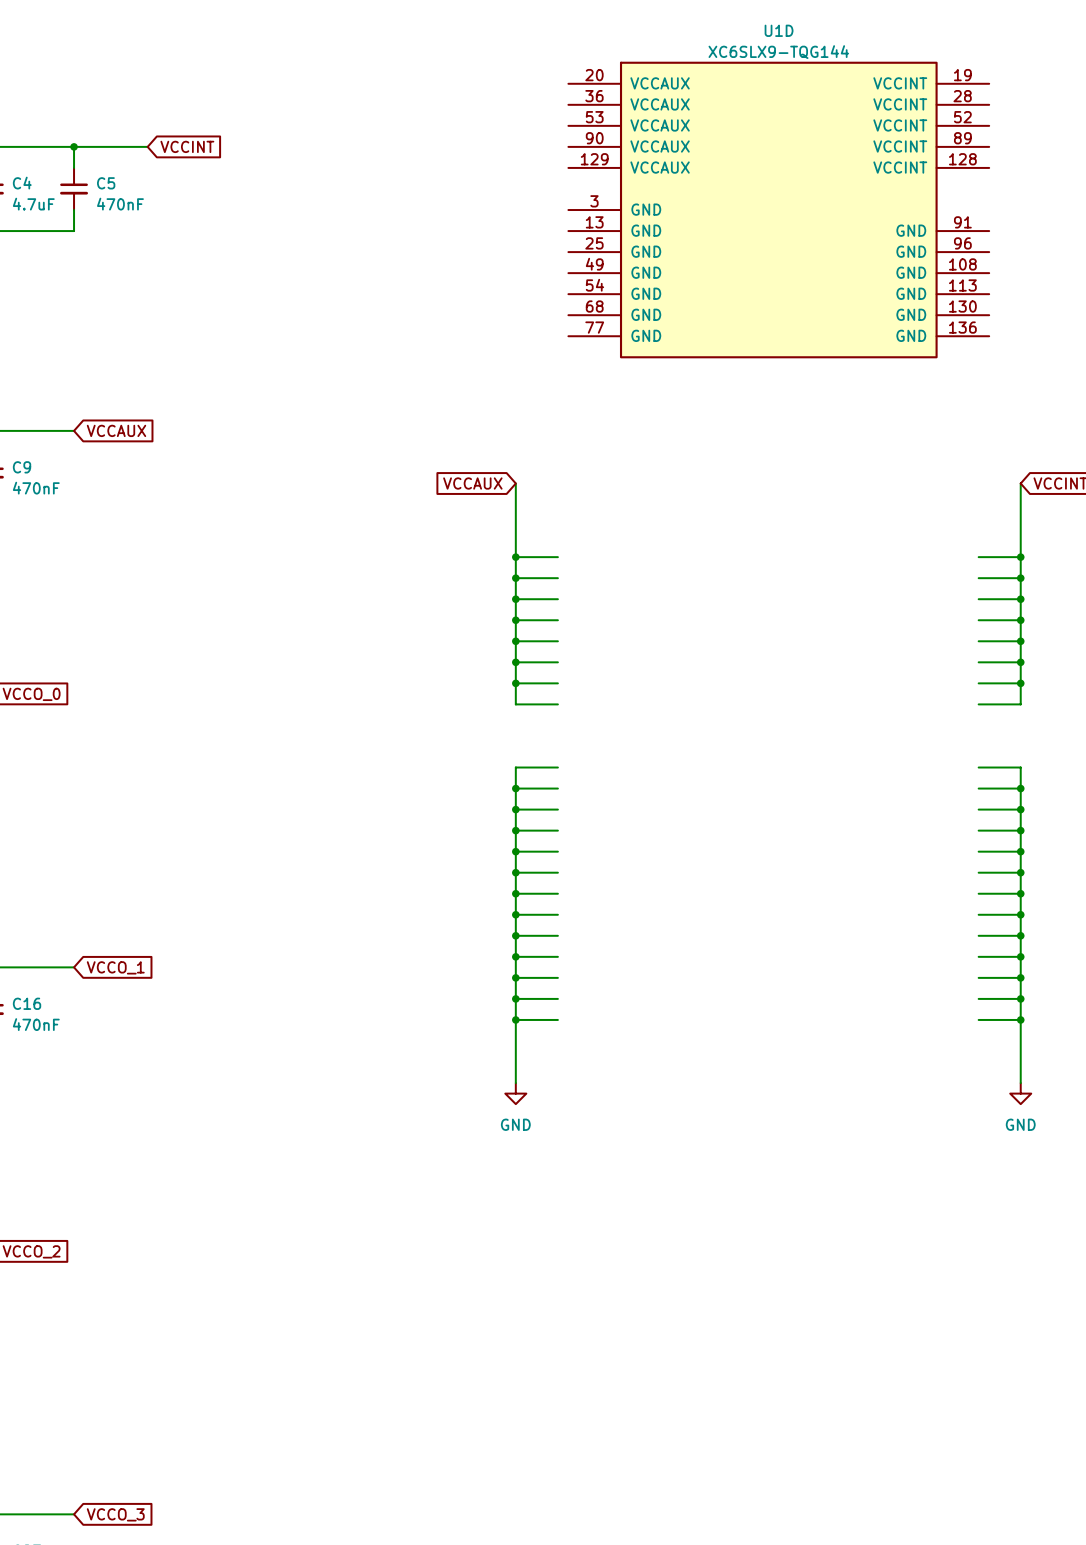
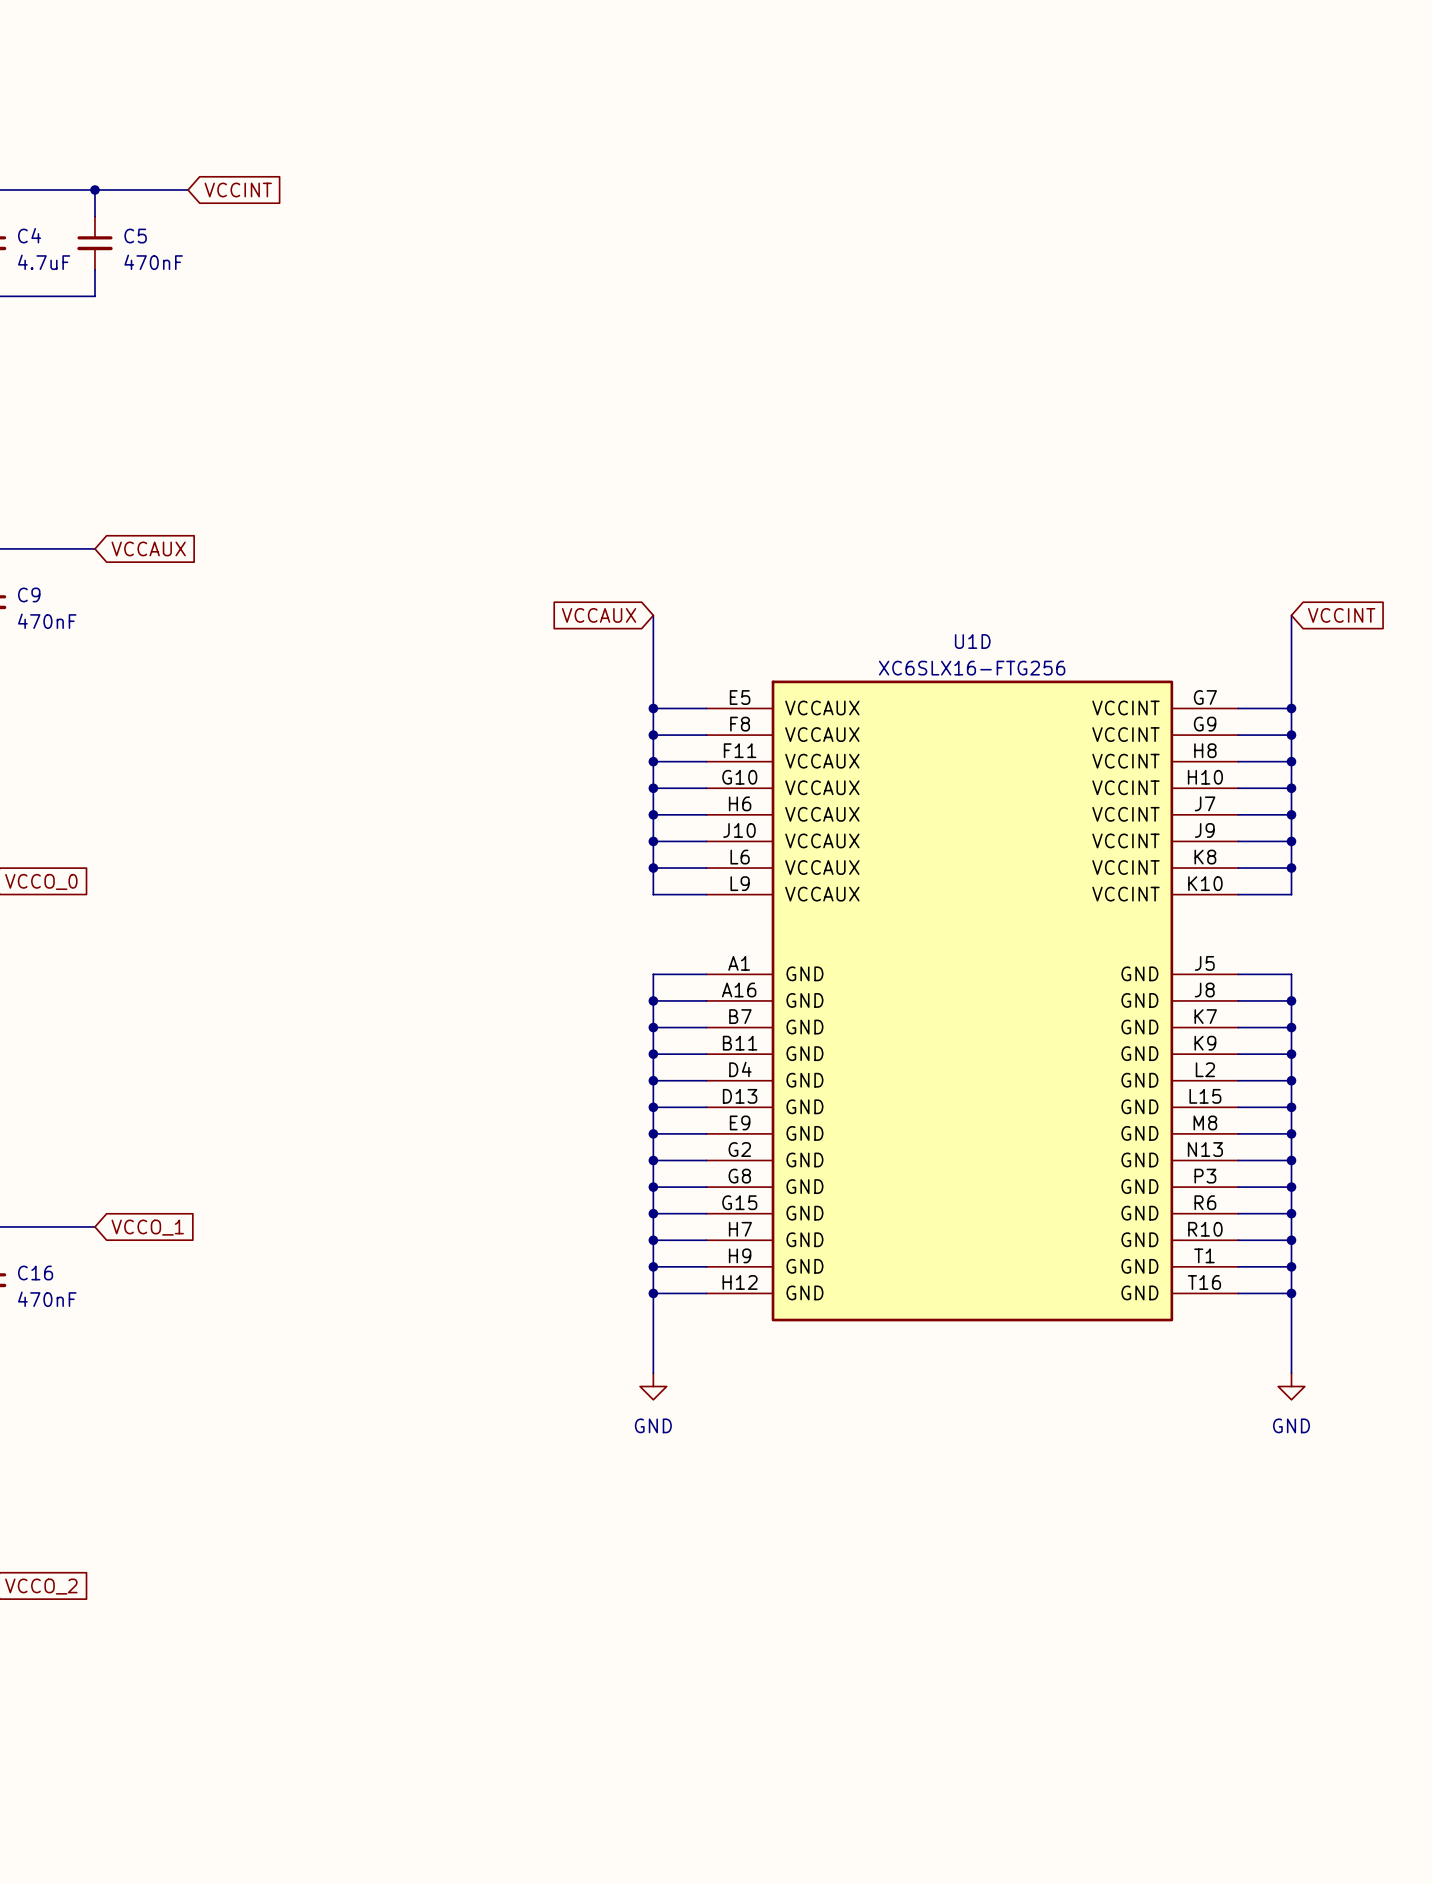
U1D name position: U1D (779, 30) -> U1D (972, 641)
U1D value: XC6SLX9-TQG144 (778, 52) -> XC6SLX16-FTG256 (972, 668)
U1D symbol: [568, 61, 990, 359] -> [706, 680, 1239, 1322]

